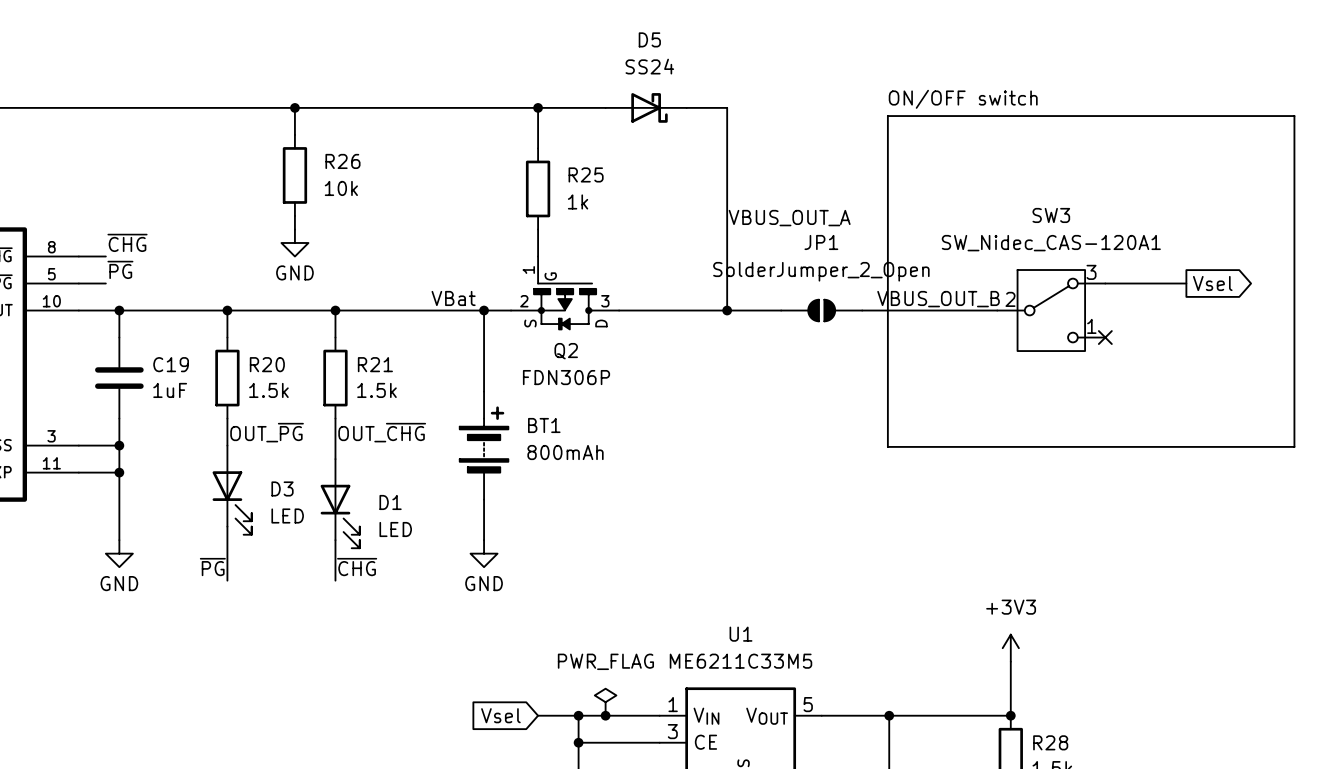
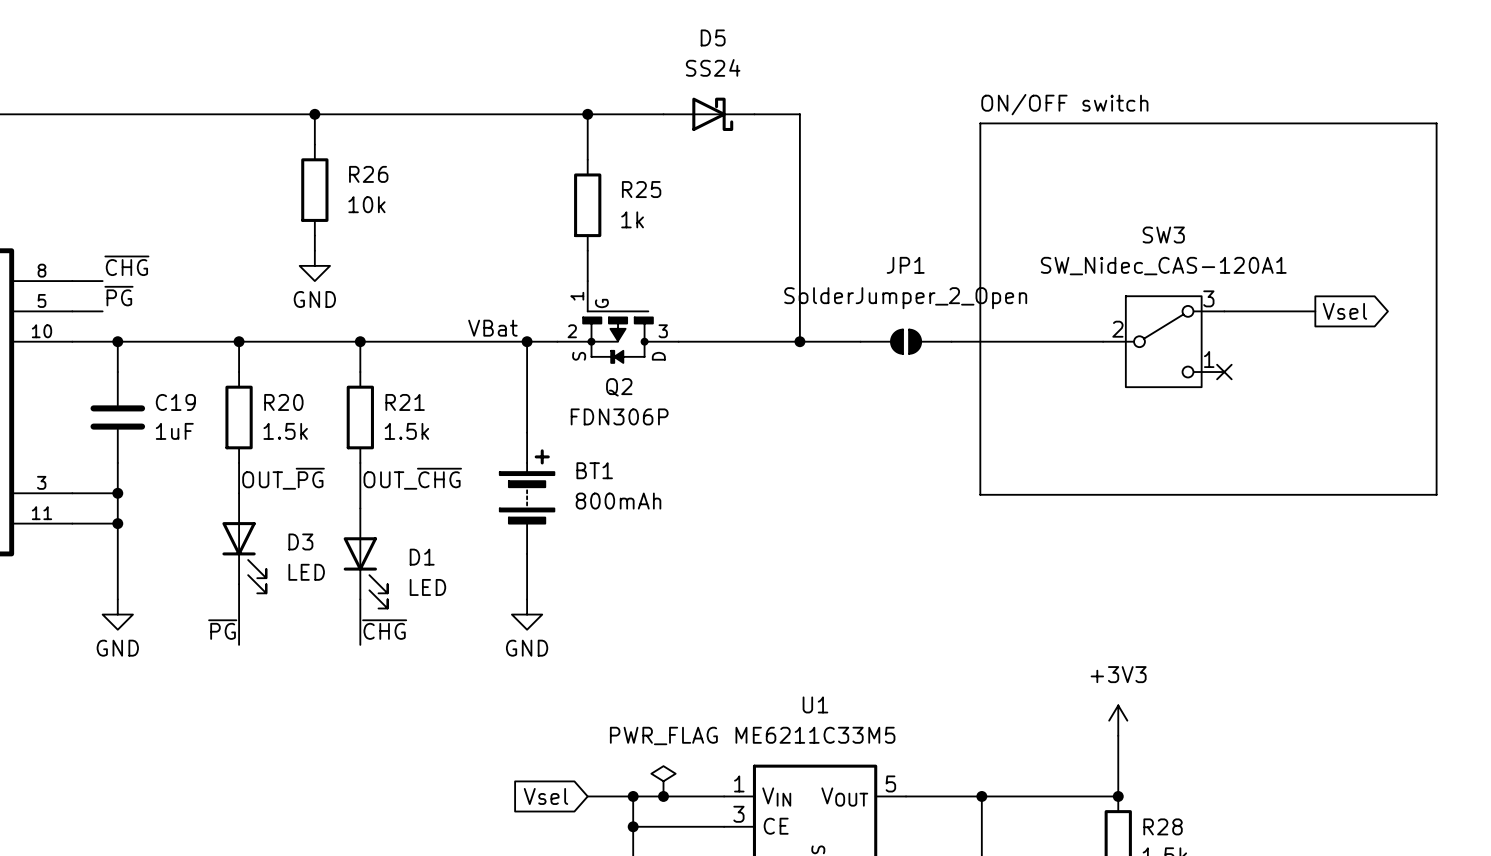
label: VBUS_OUT_A (789, 218) -> none
label: VBUS_OUT_B (938, 299) -> none

